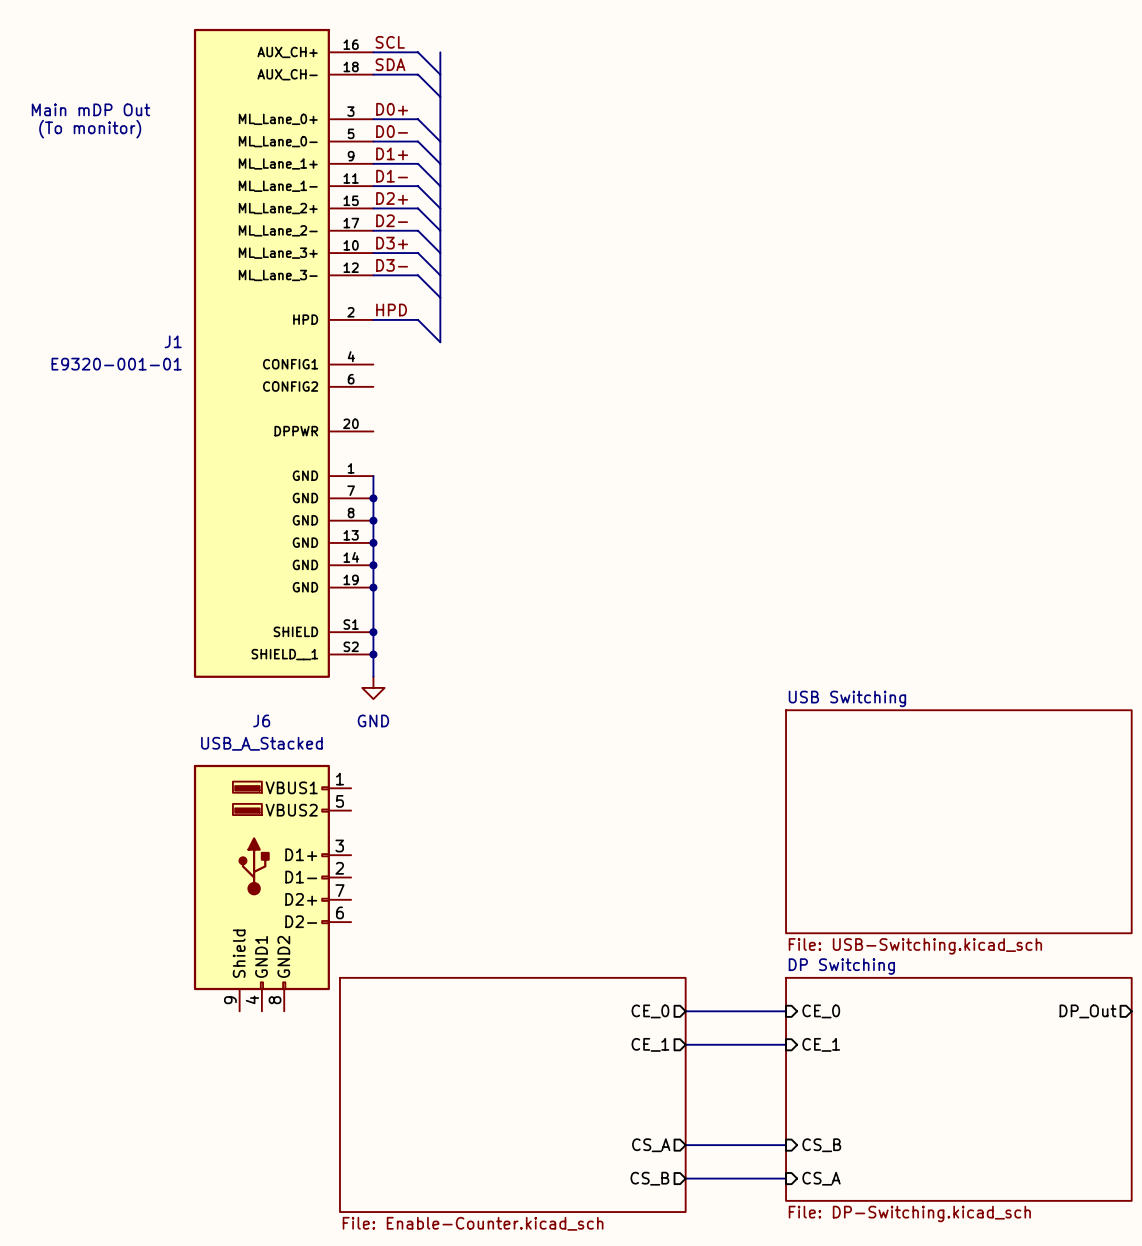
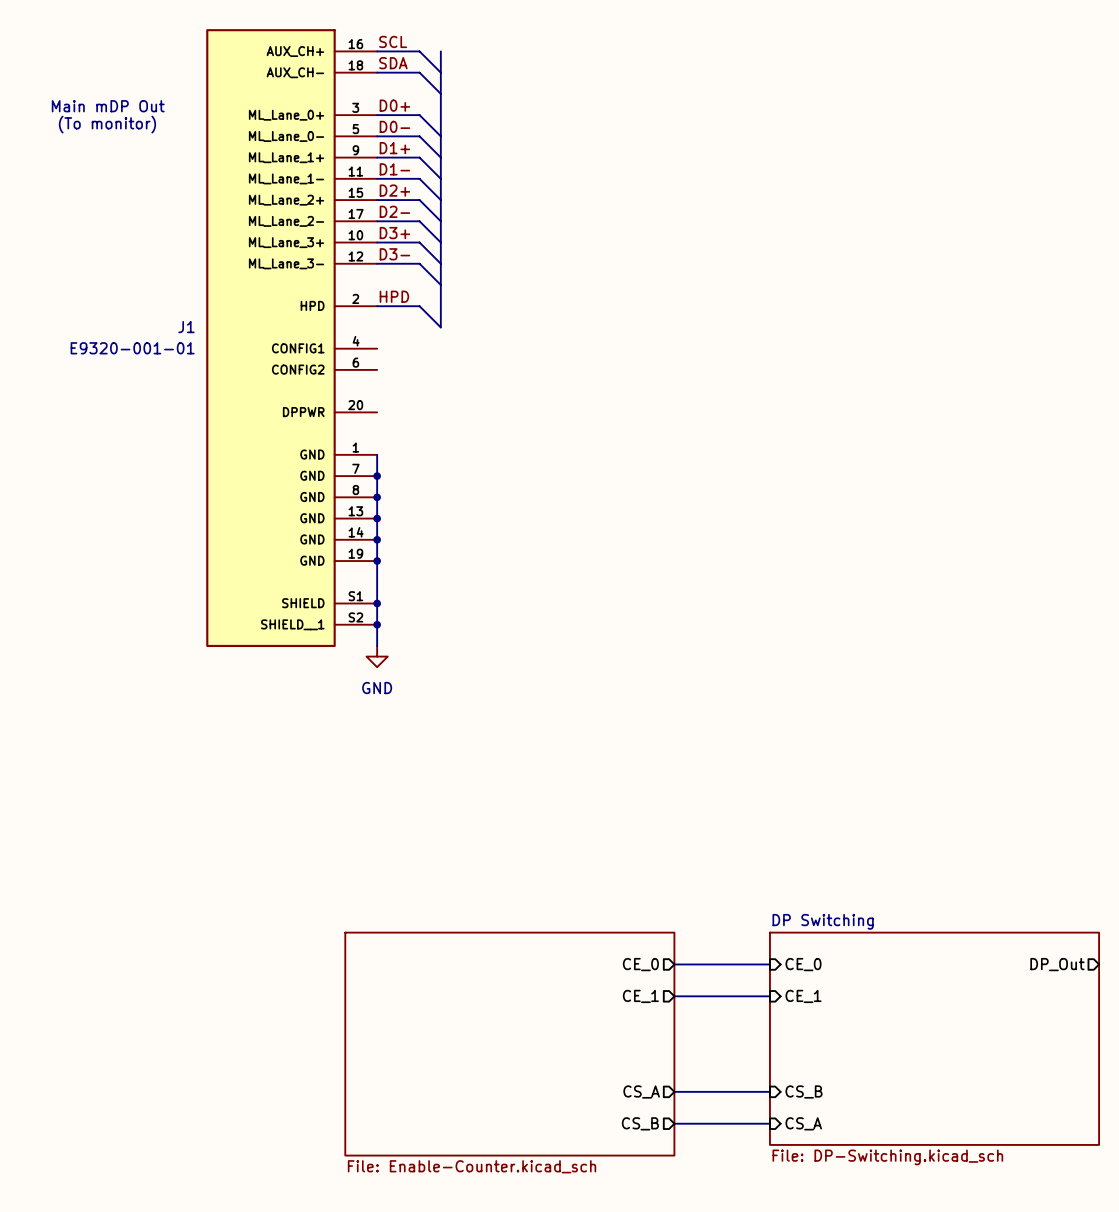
sheet USB Switching: File: USB-Switching.kicad_sch (958, 821) -> none
J6: USB_A_Stacked (272, 888) -> none

